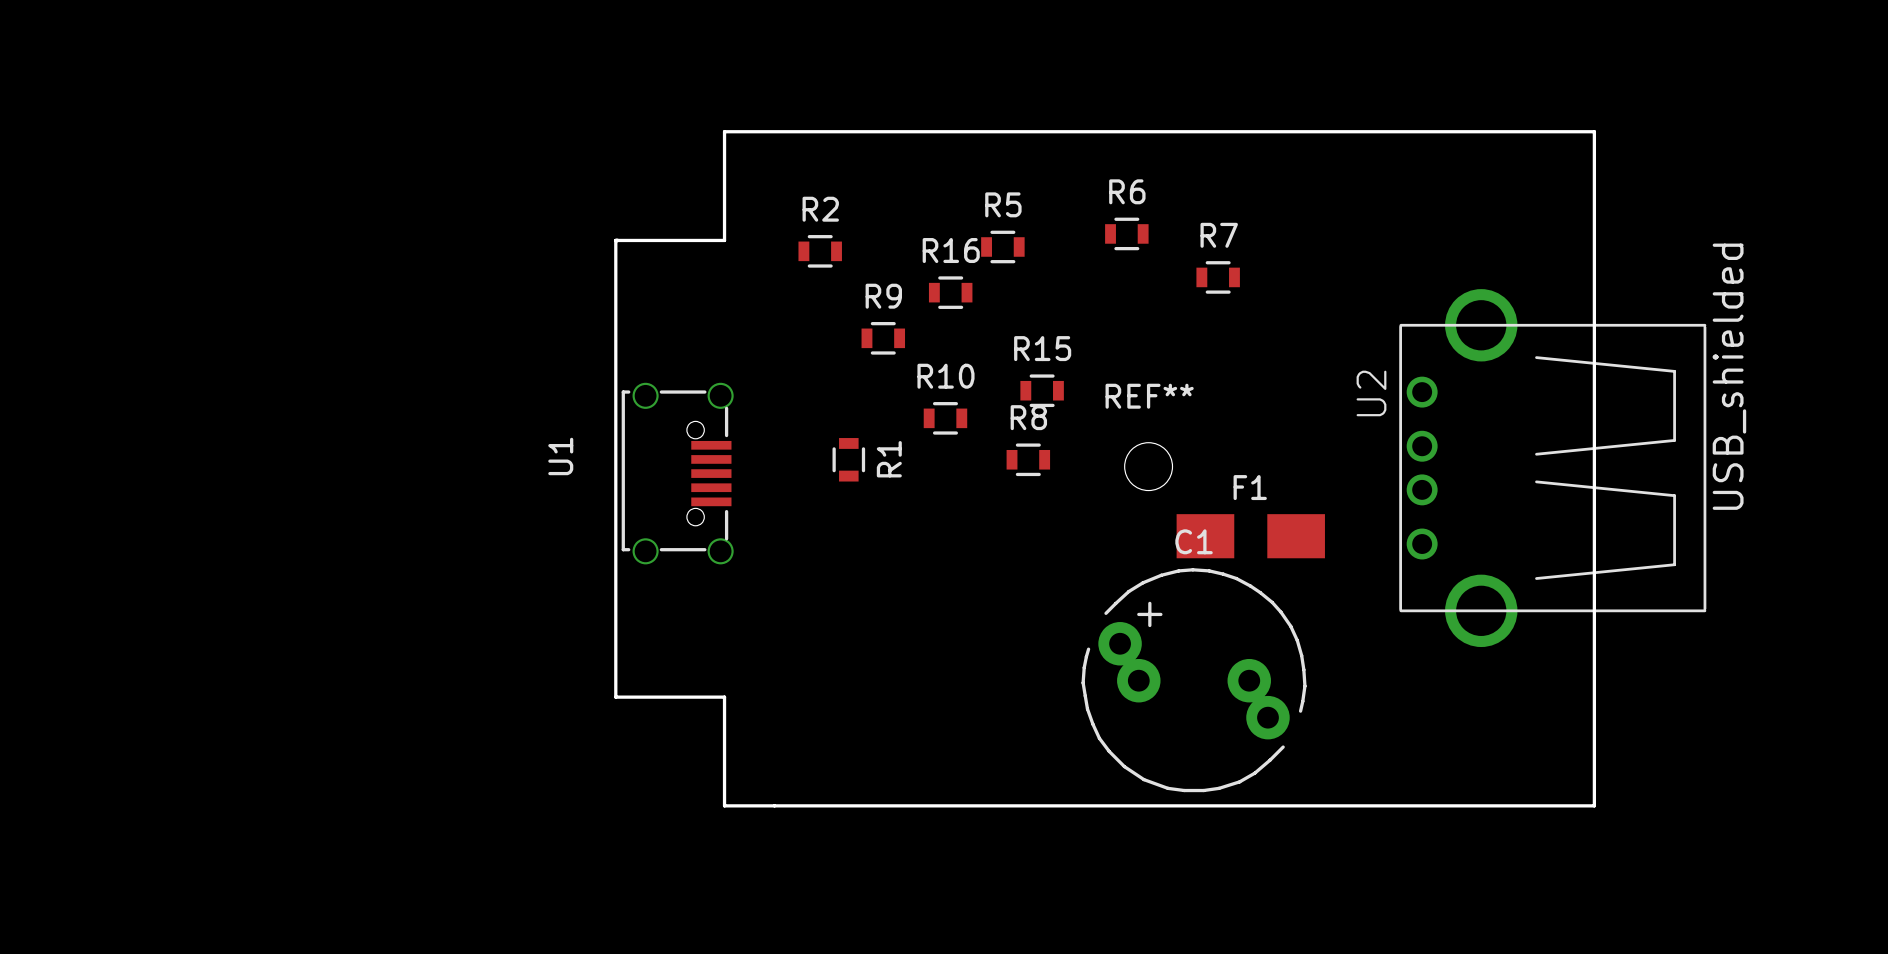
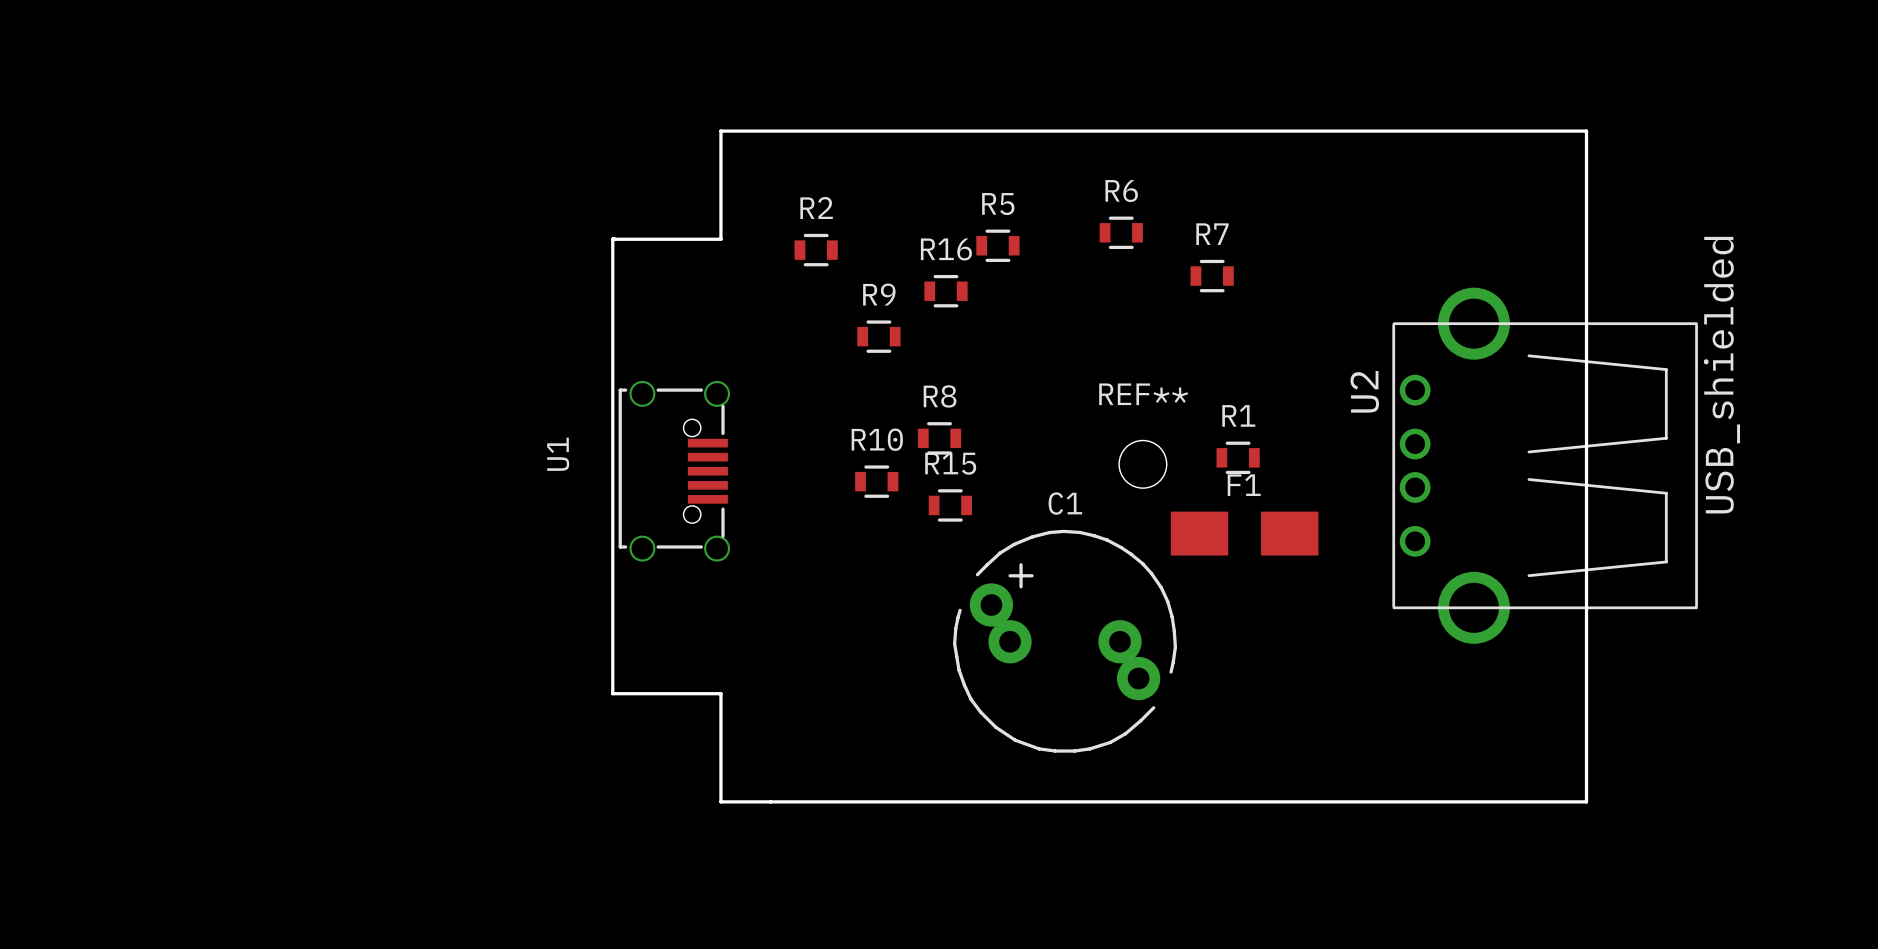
R15 position: (1042, 390) -> (950, 505)
R10 position: (945, 418) -> (876, 481)
R1 rotation: 0° (848, 459) -> 90° clockwise (1238, 457)
R1 position: (848, 459) -> (1238, 457)
R1 name position: R1 (889, 459) -> R1 (1238, 415)
R8 position: (1028, 459) -> (939, 438)
C1 position: (1194, 680) -> (1065, 641)

